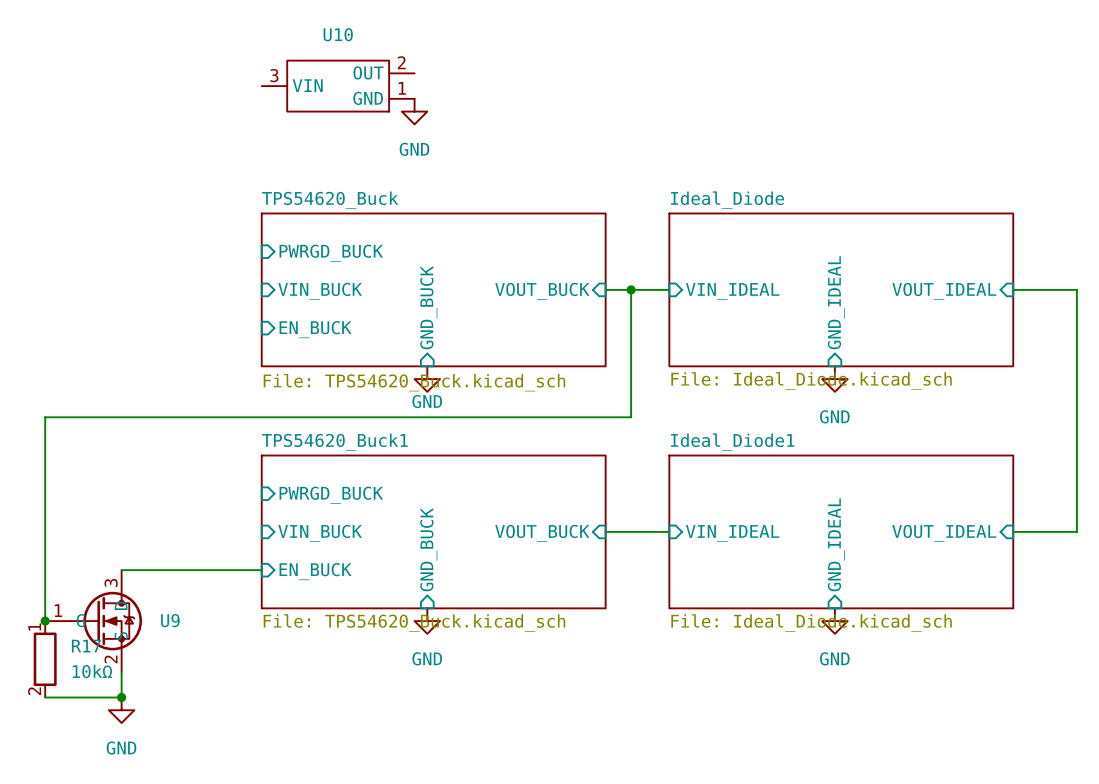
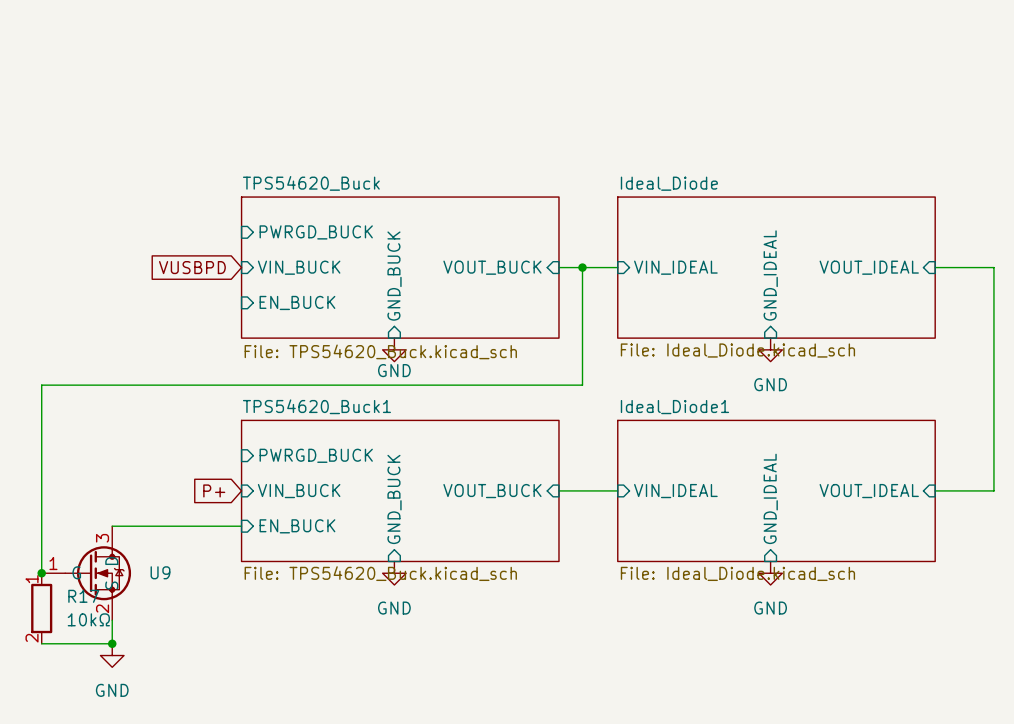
U10: (338, 86) -> none
power symbol: GND (414, 111) -> none
global label: none -> VUSBPD (192, 267)
global label: none -> P+ (214, 490)

